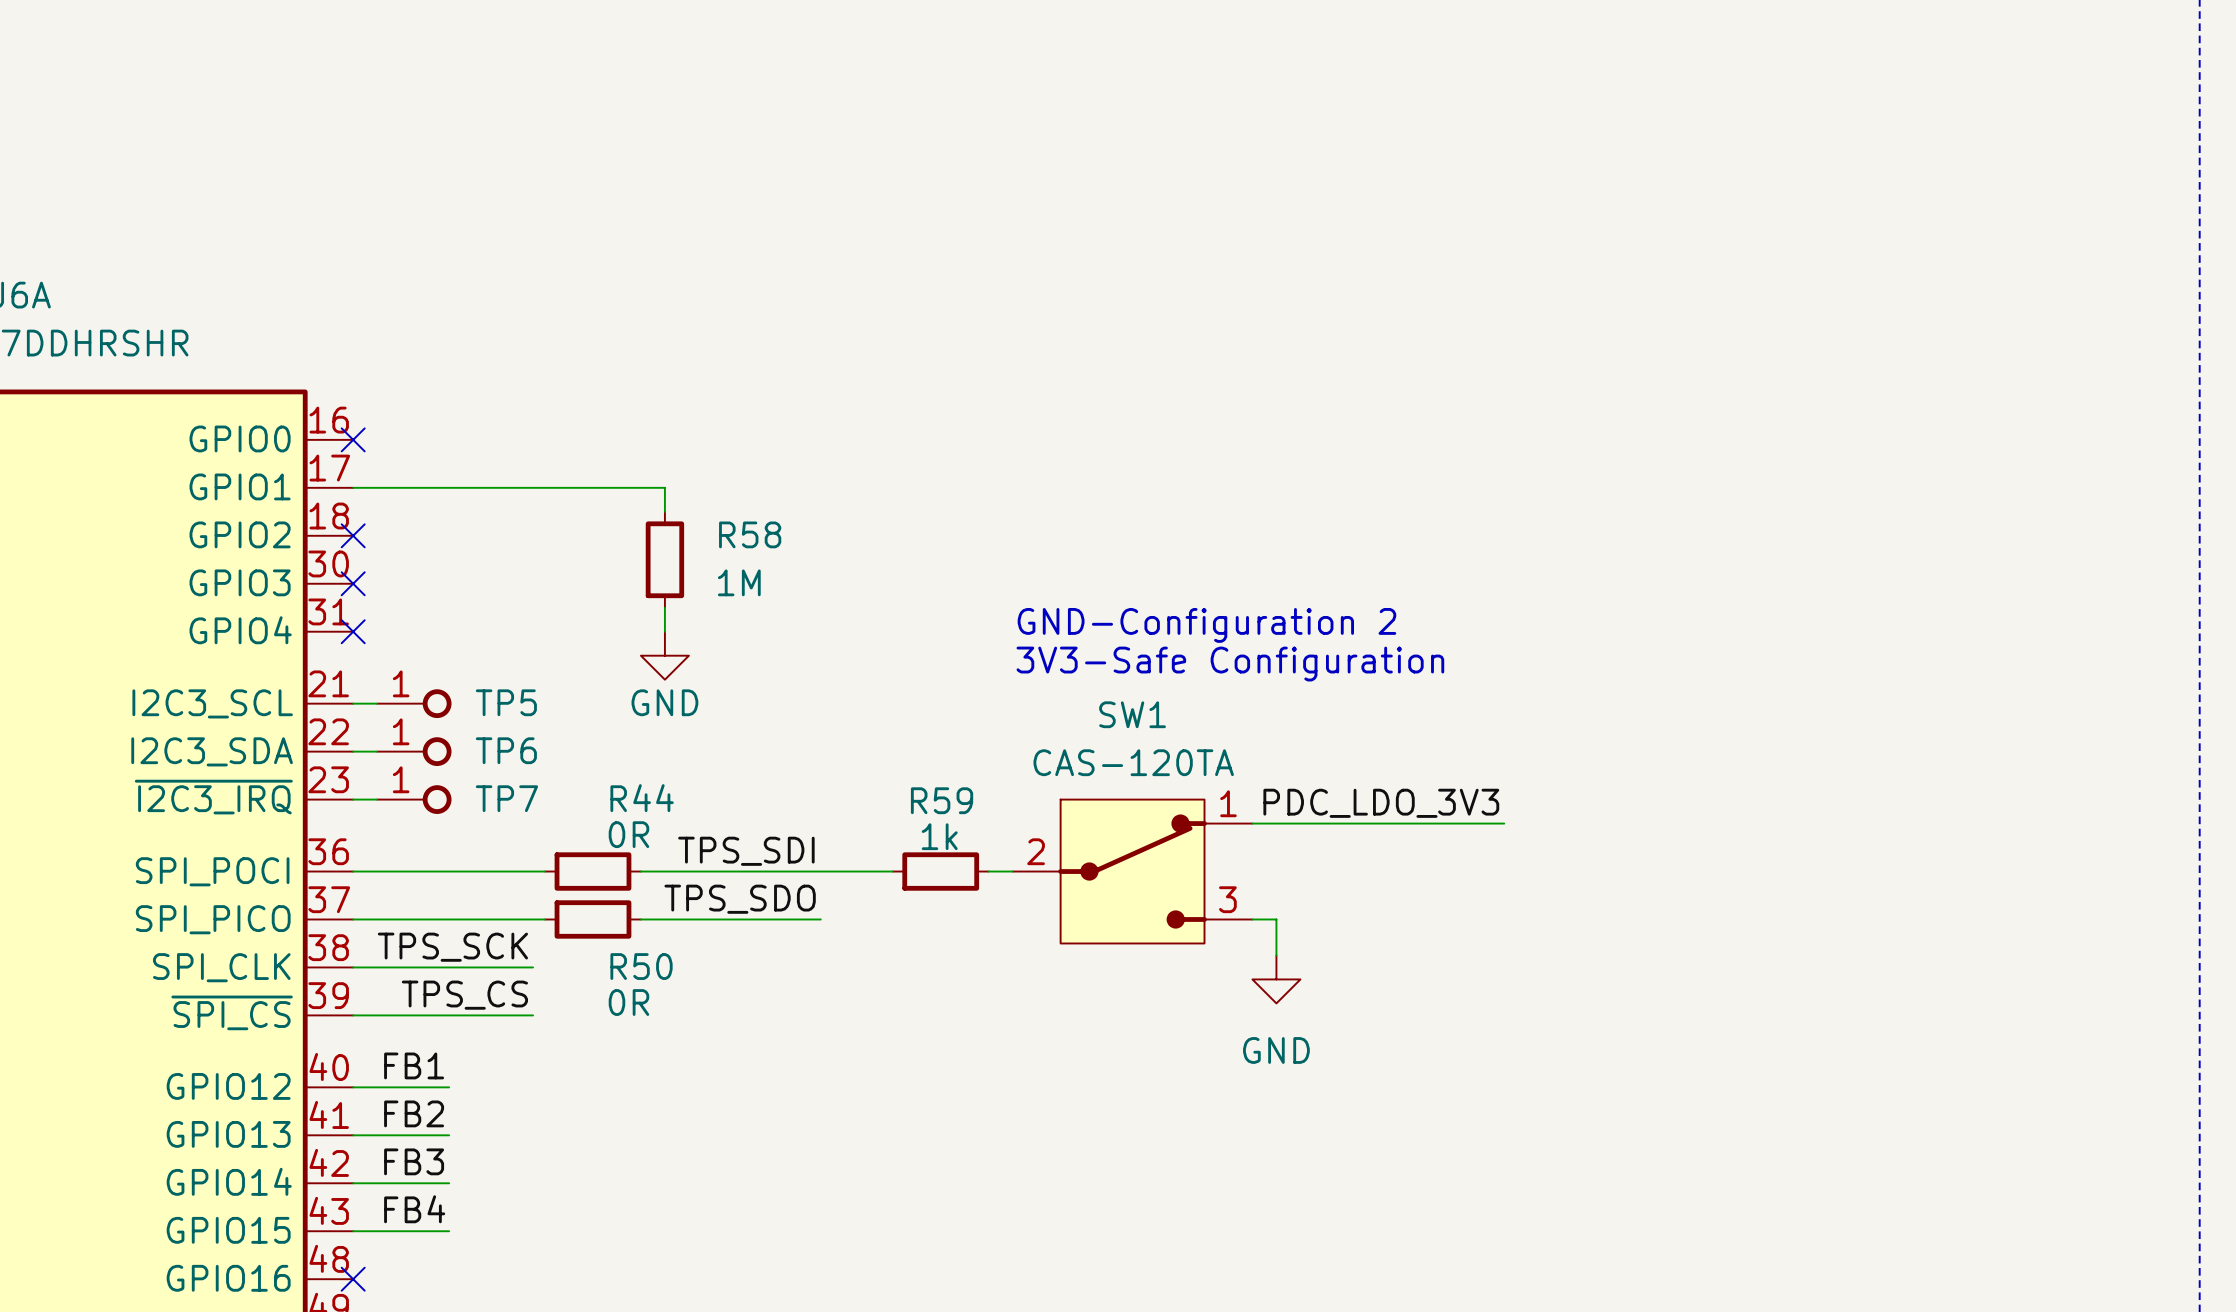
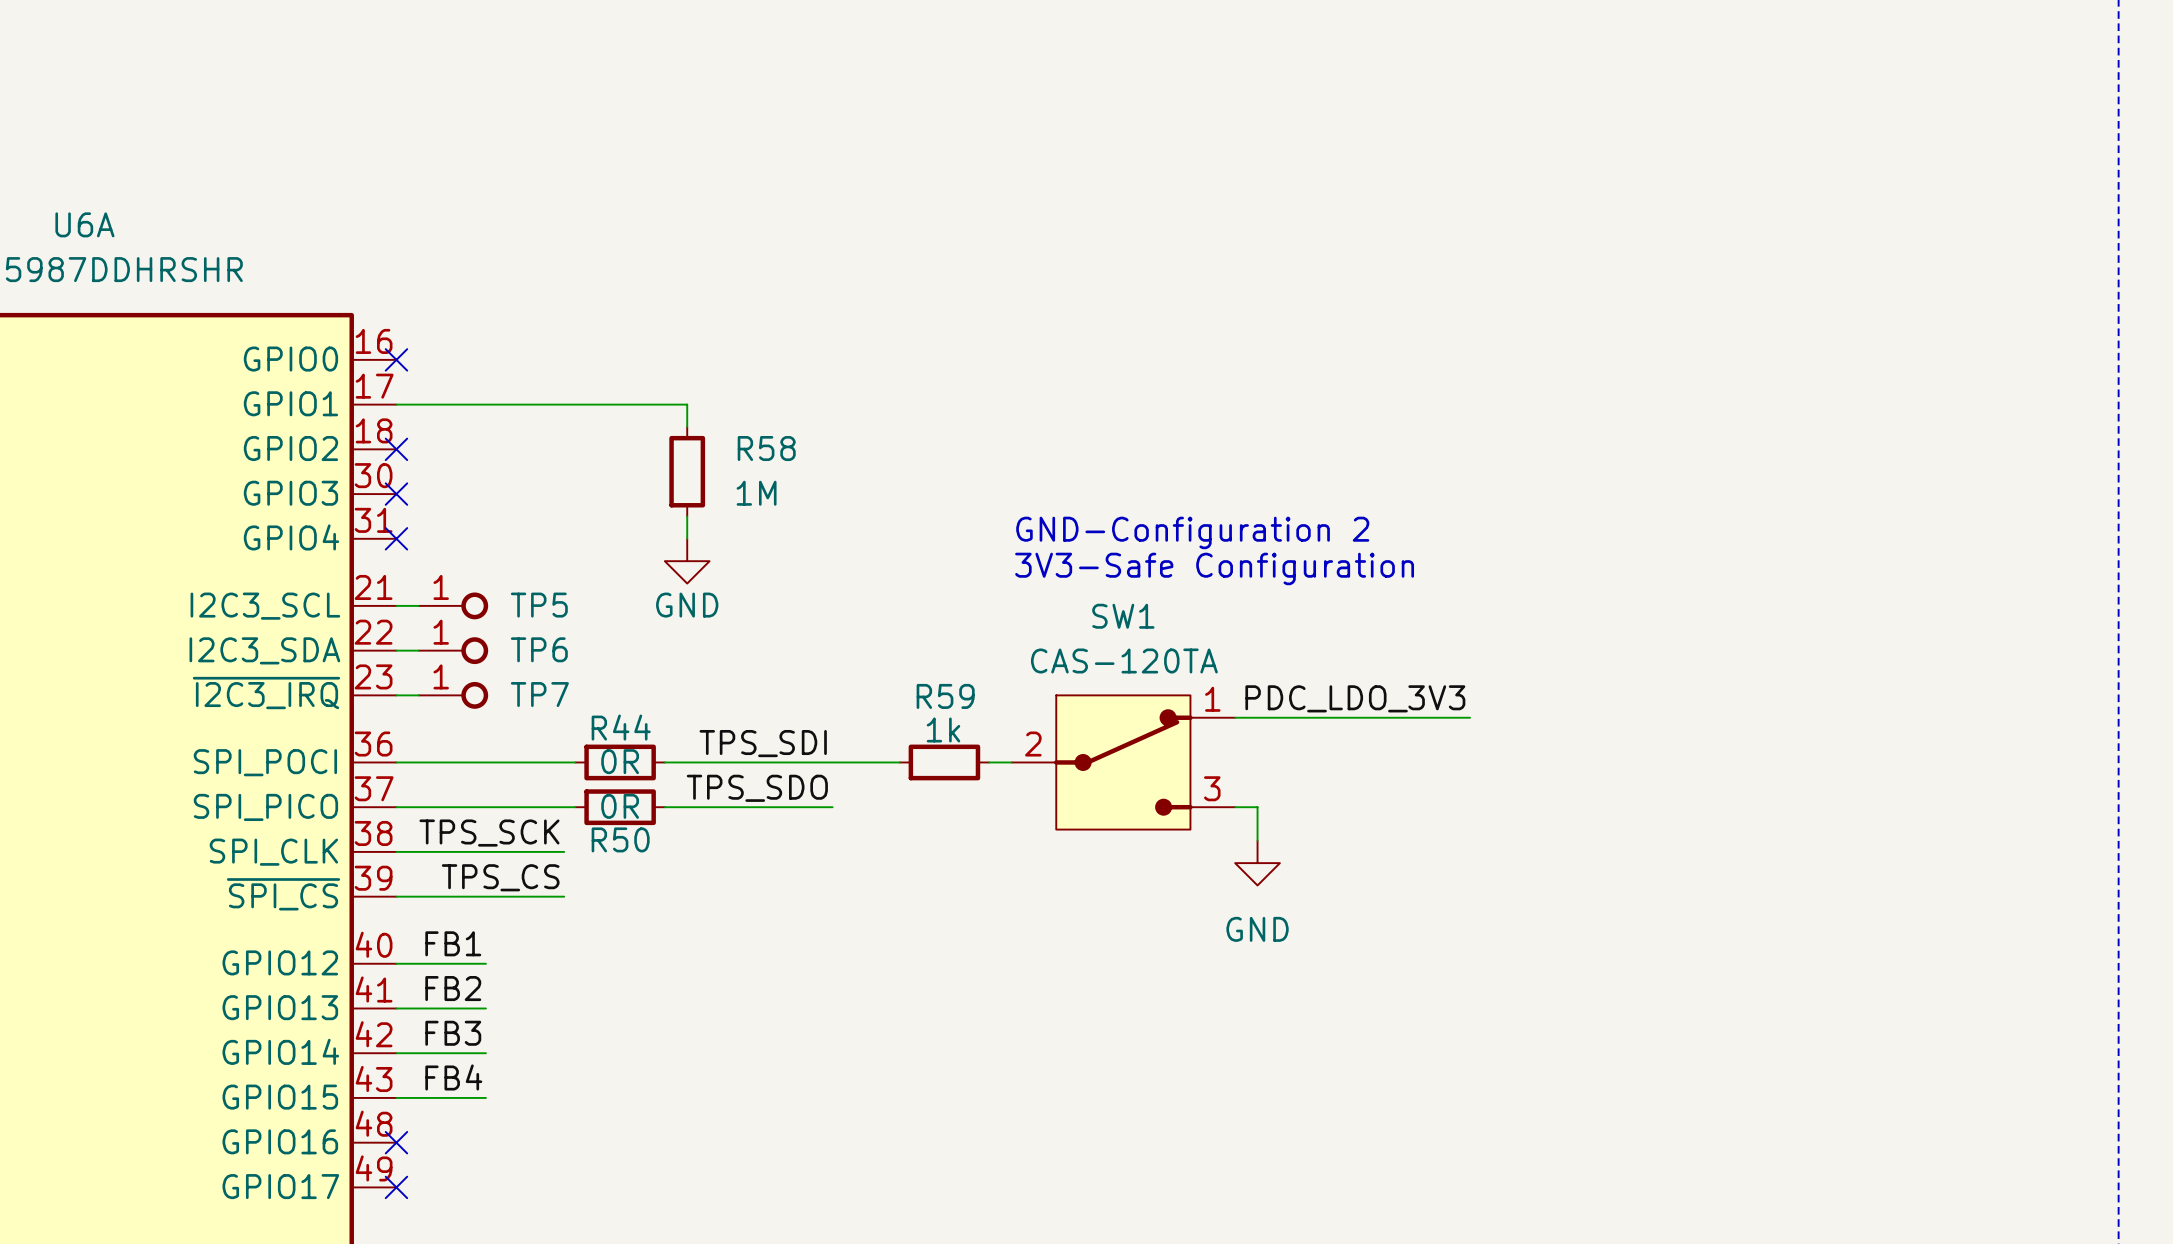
R44 name position: R44 (642, 798) -> R44 (621, 727)
R44 text position: 0R (628, 834) -> 0R (620, 761)
R50 name position: R50 (641, 966) -> R50 (620, 839)
R50 text position: 0R (628, 1002) -> 0R (620, 806)

